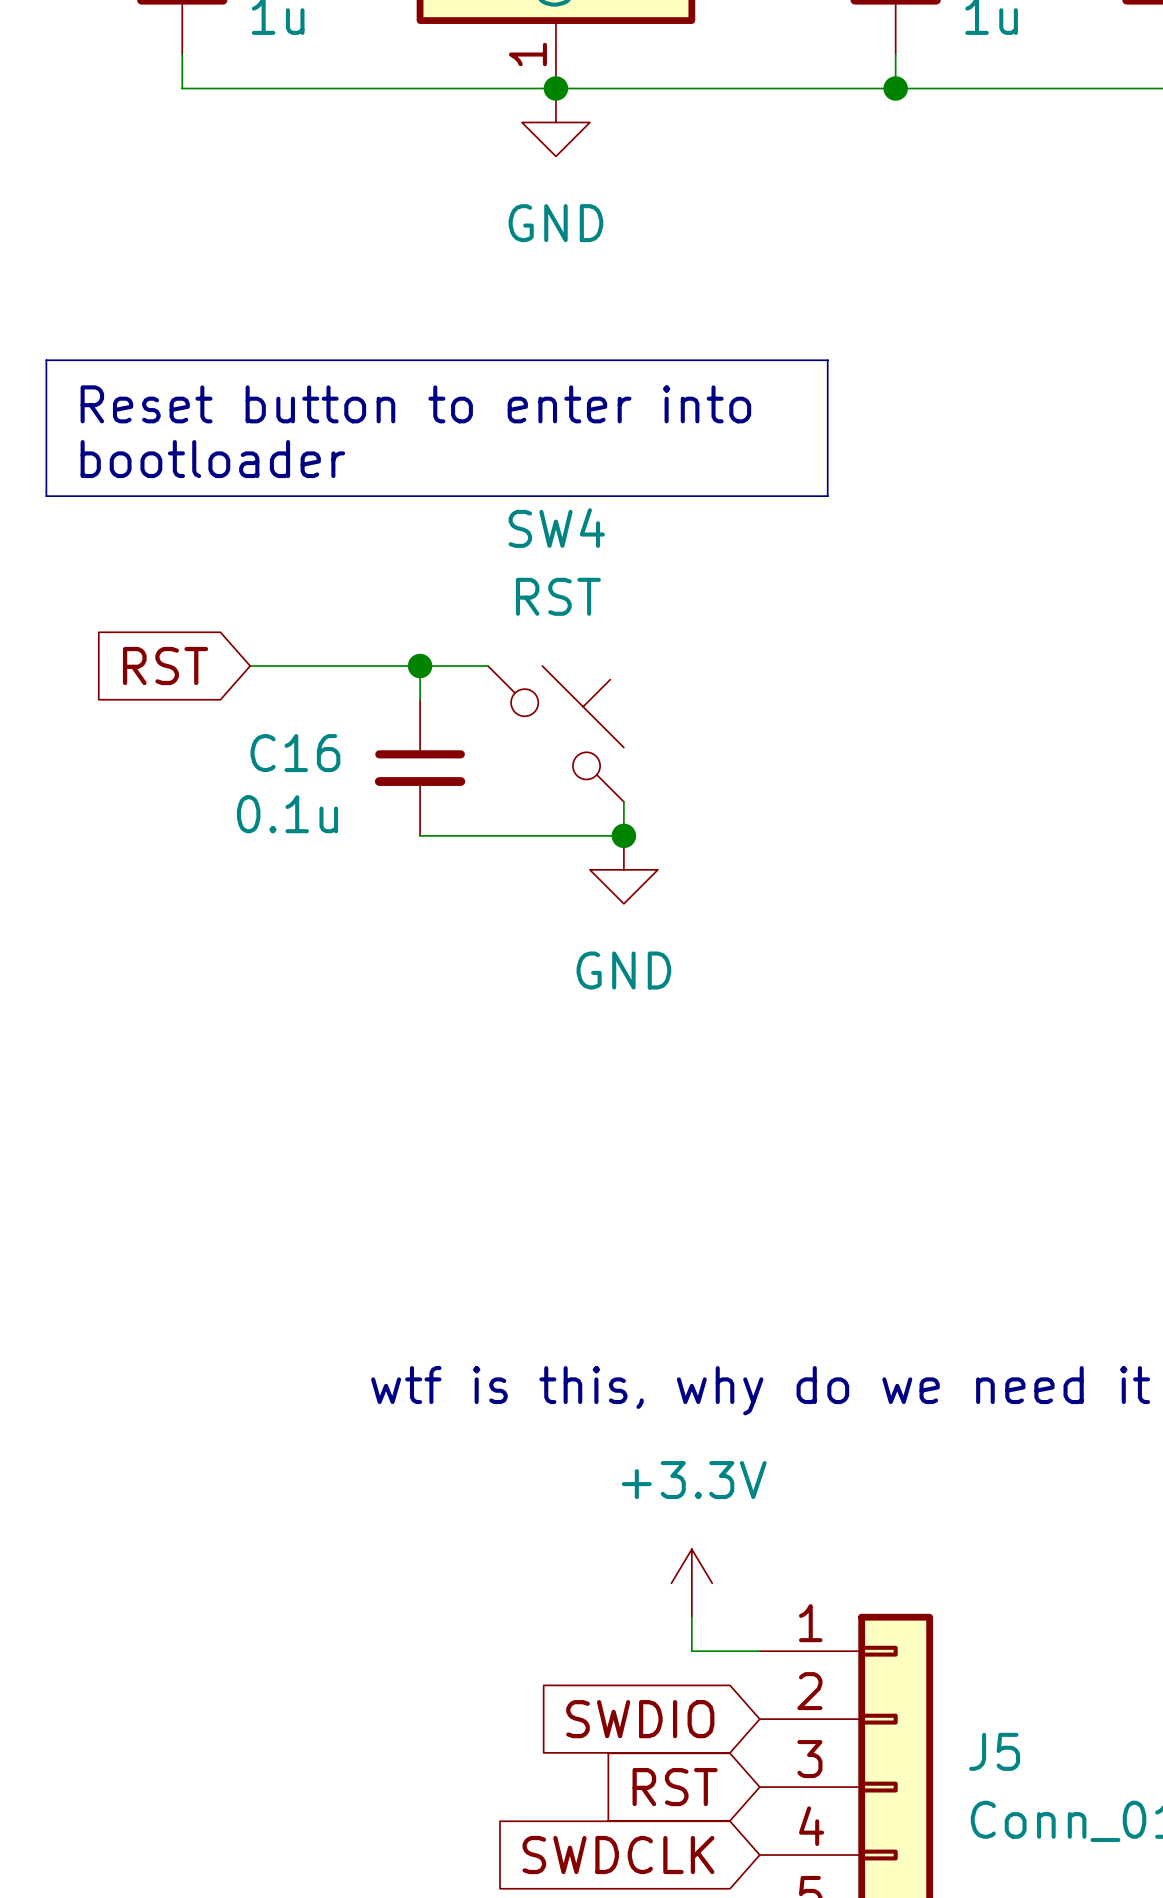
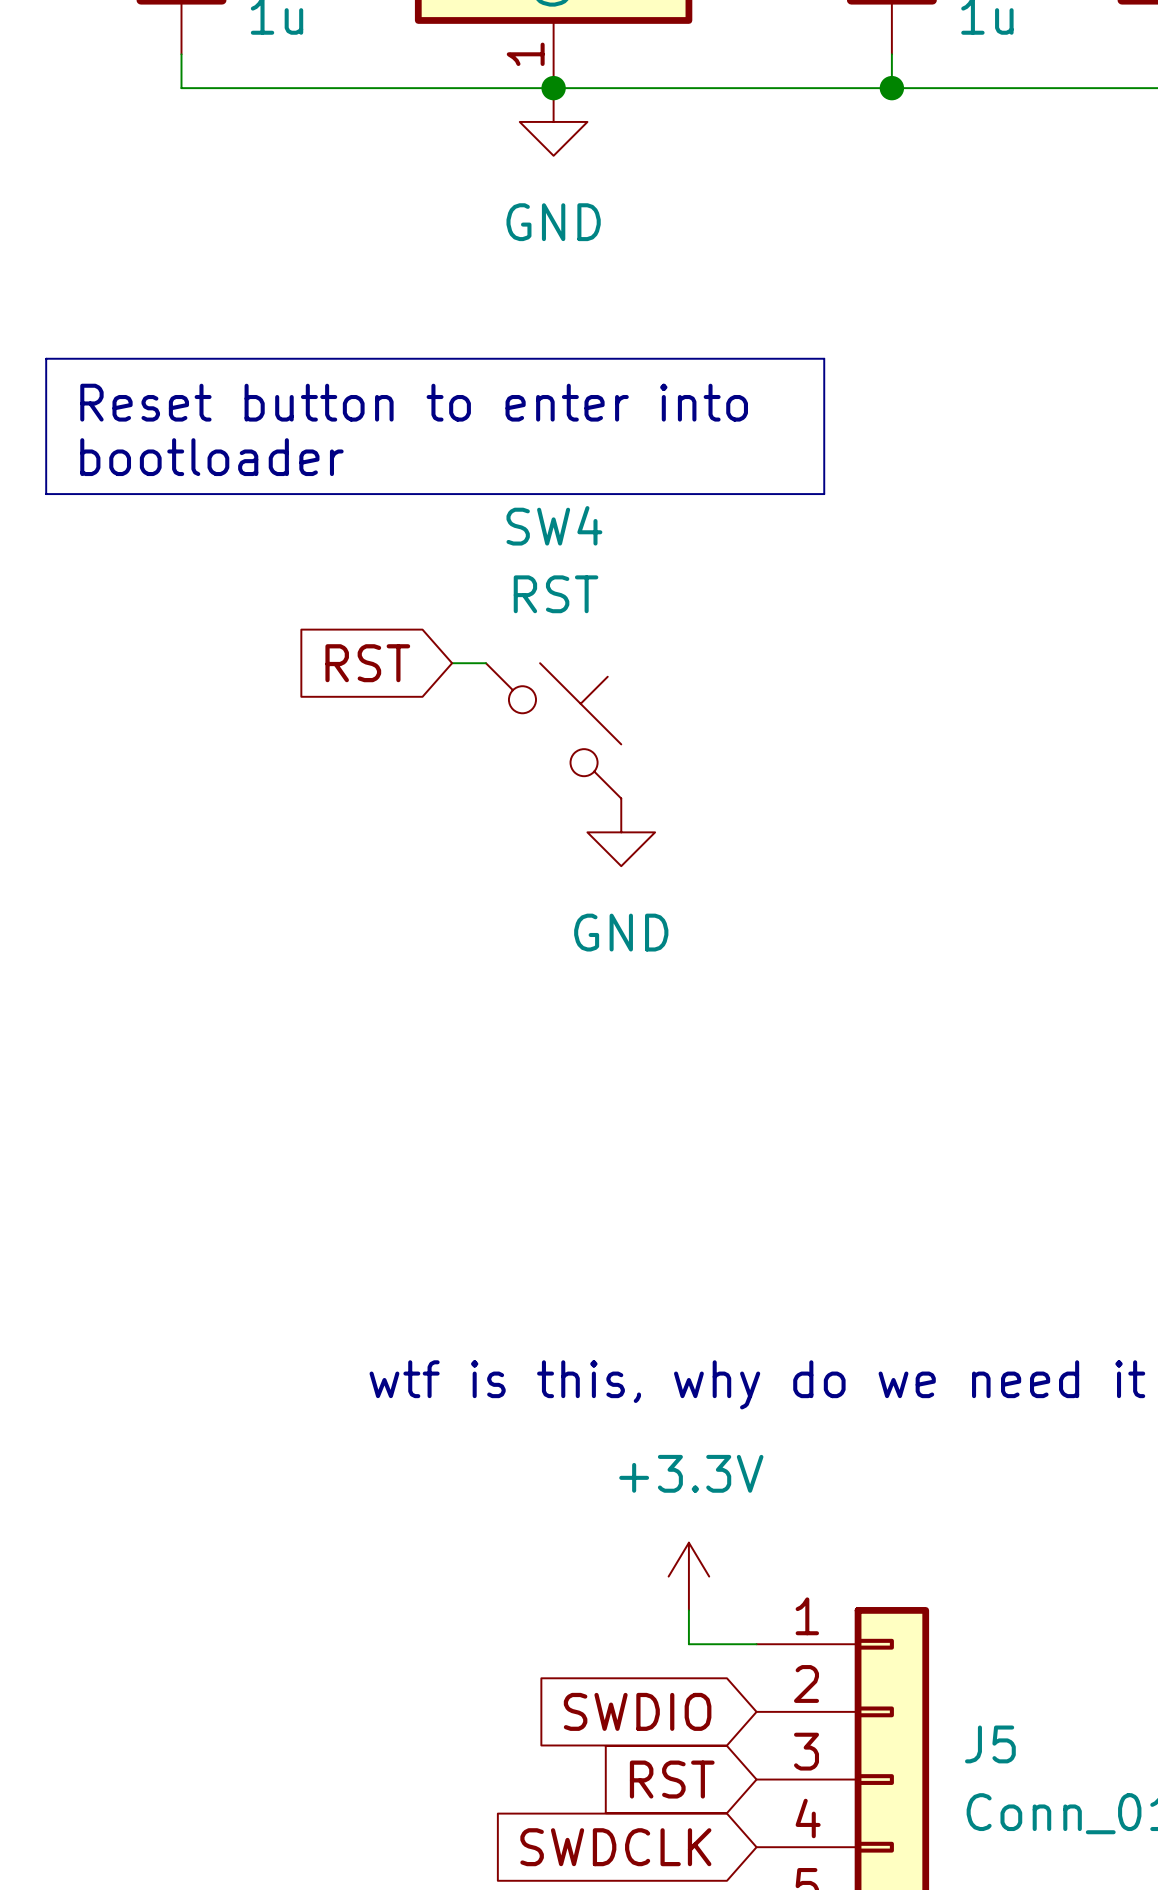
global label position: RST (165, 666) -> RST (367, 663)
wire: (250, 666) (454, 666) -> none
wire: (420, 666) (420, 699) -> none
junction: (420, 666) -> none
C16: 0.1u (420, 767) -> none
wire: (623, 801) (623, 835) (420, 835) -> none
junction: (623, 835) -> none
power symbol position: GND (623, 869) -> GND (621, 832)

